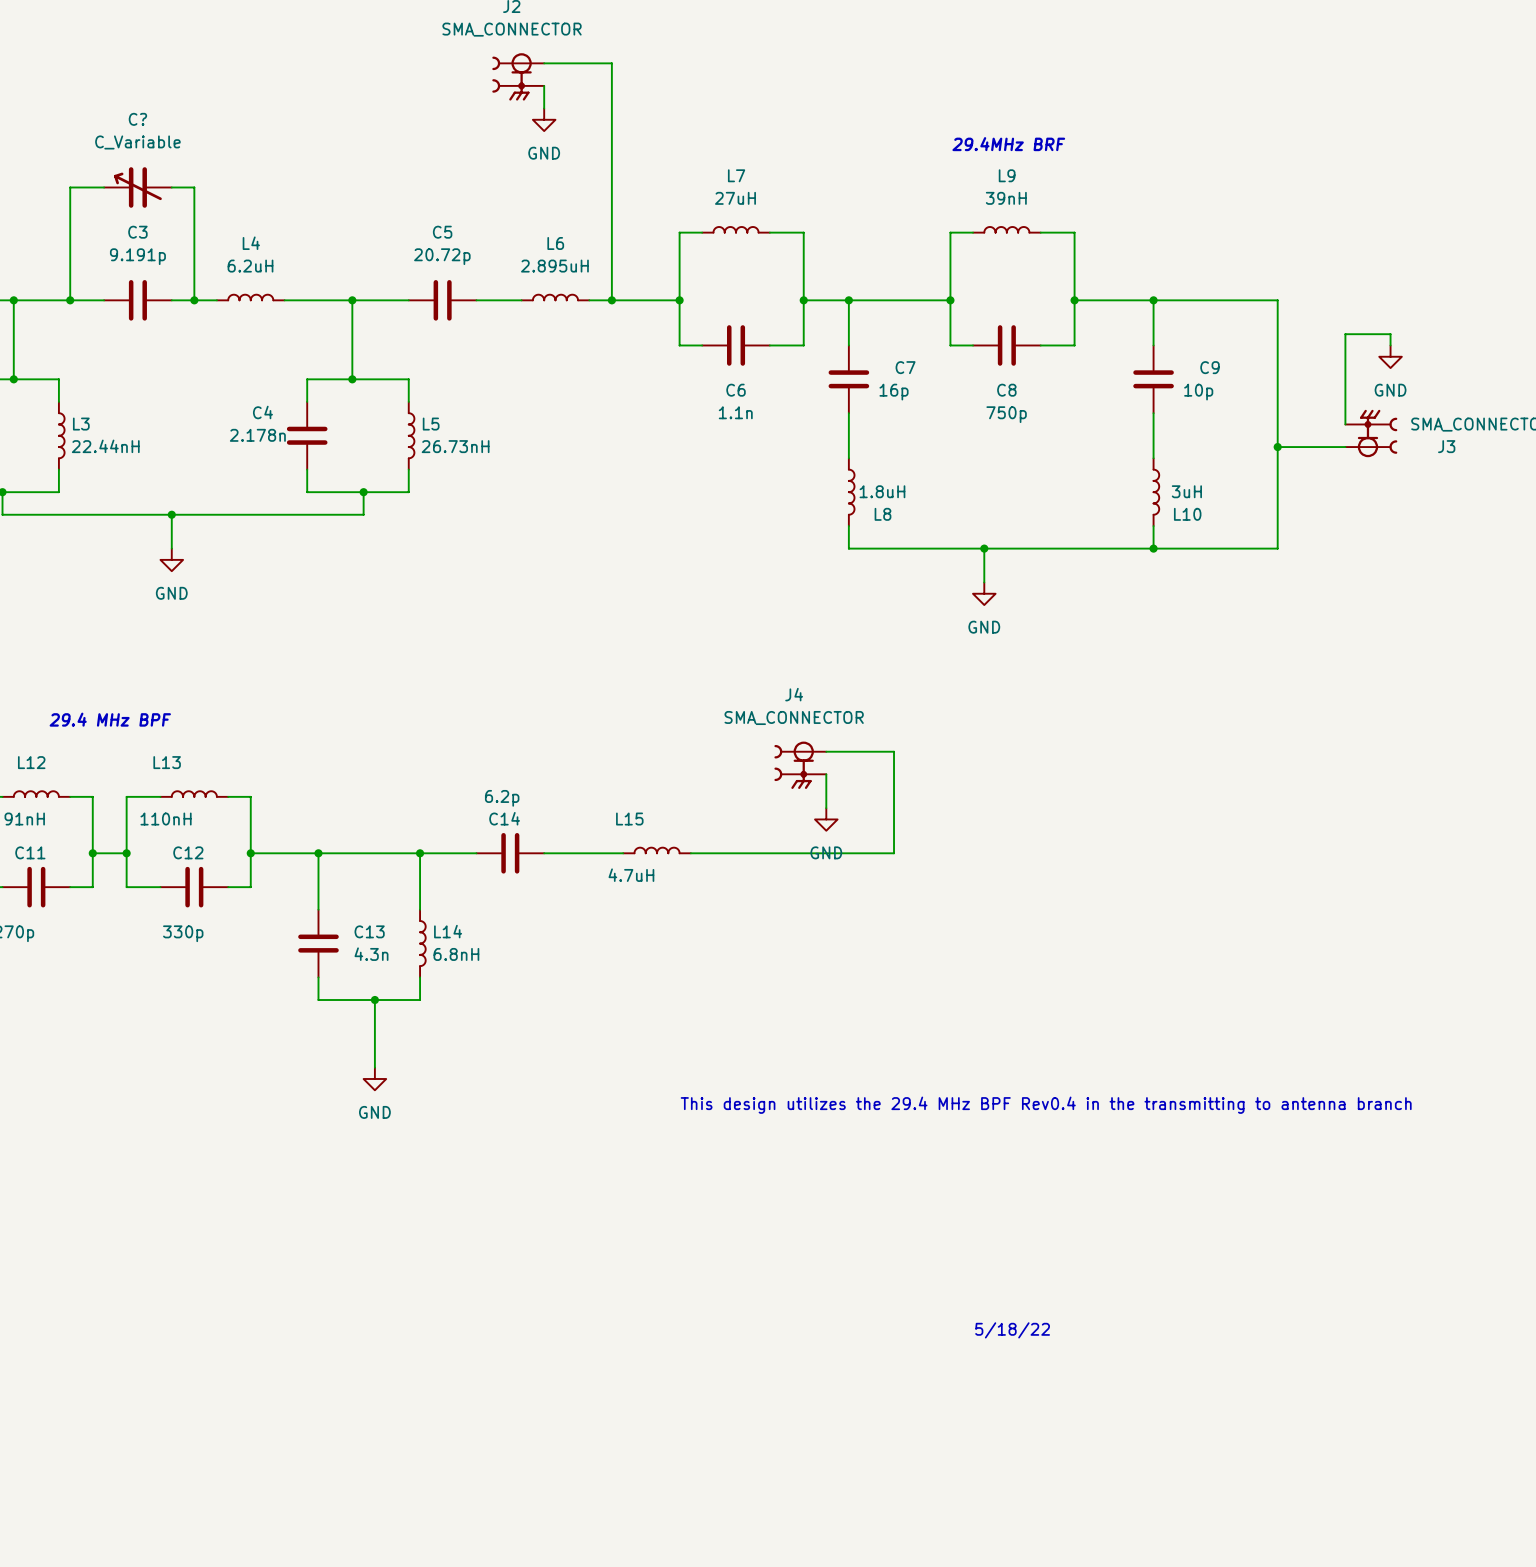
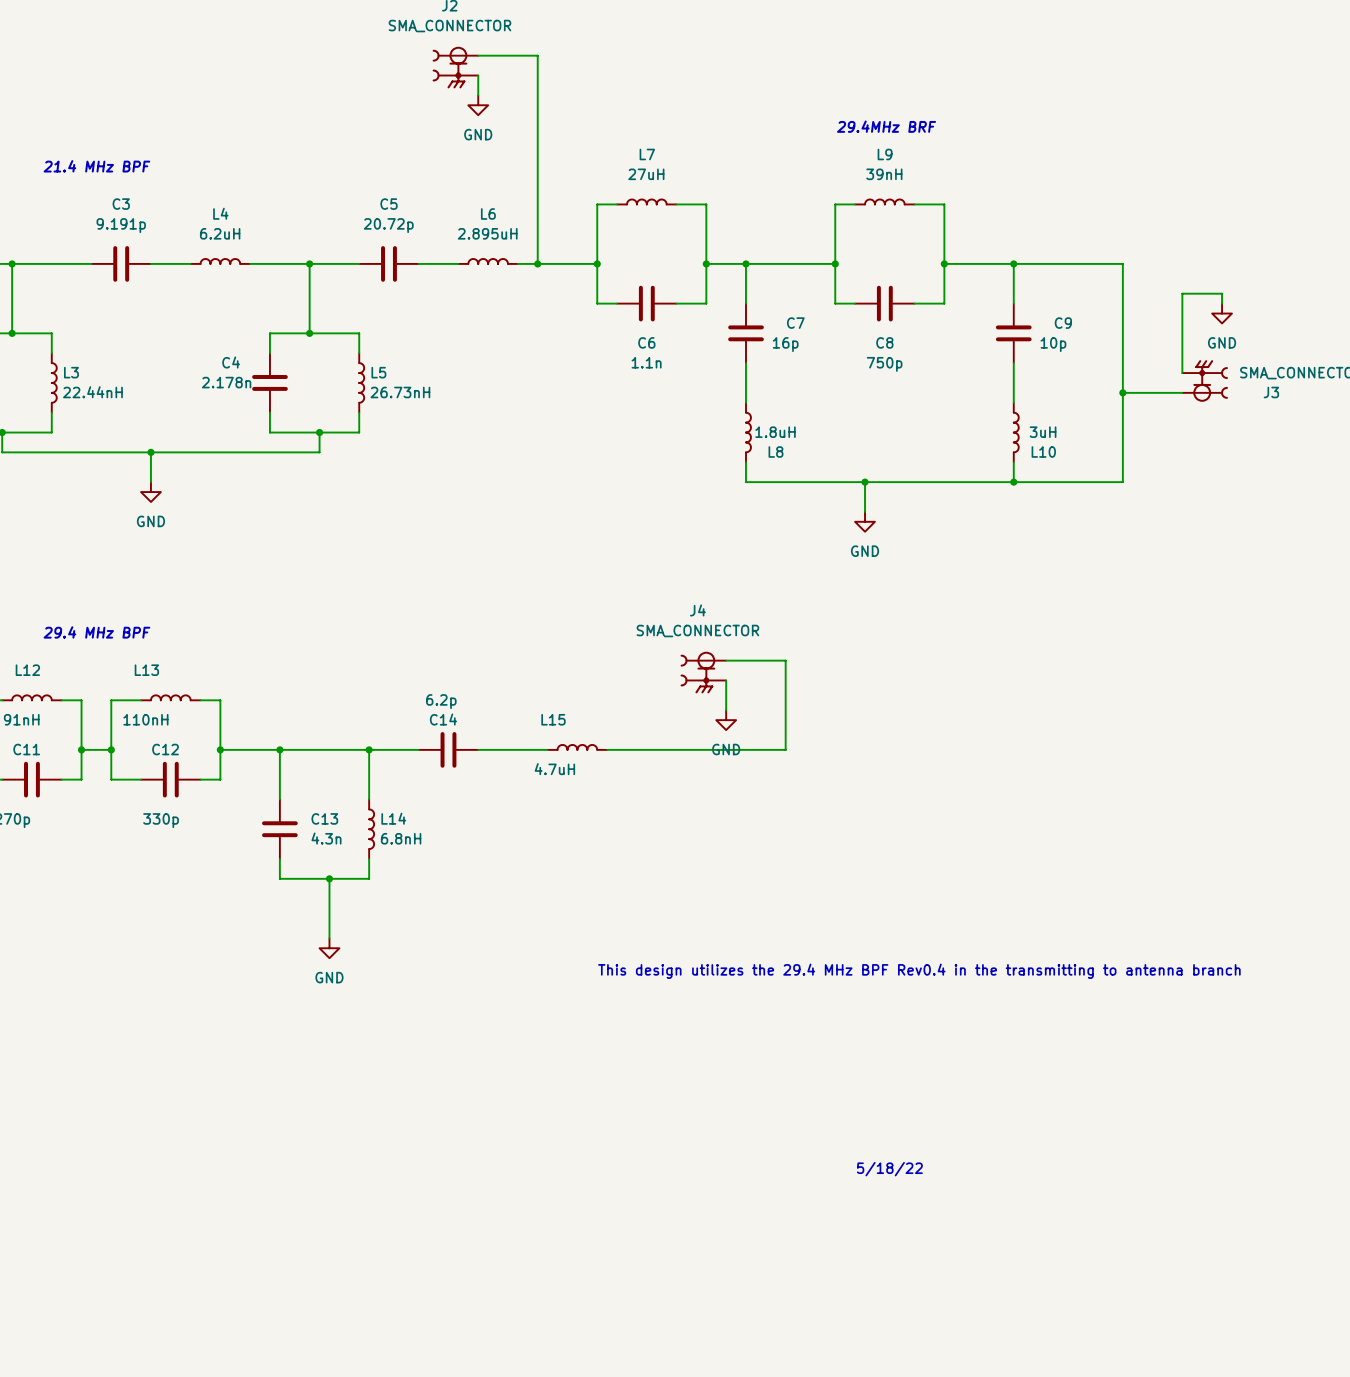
wire: (104, 187) (70, 187) (70, 300) -> none
C?: C_Variable (137, 187) -> none
wire: (171, 187) (194, 187) (194, 300) -> none
text: none -> 21.4 MHz BPF (96, 166)
junction: (70, 300) -> none
junction: (194, 300) -> none

